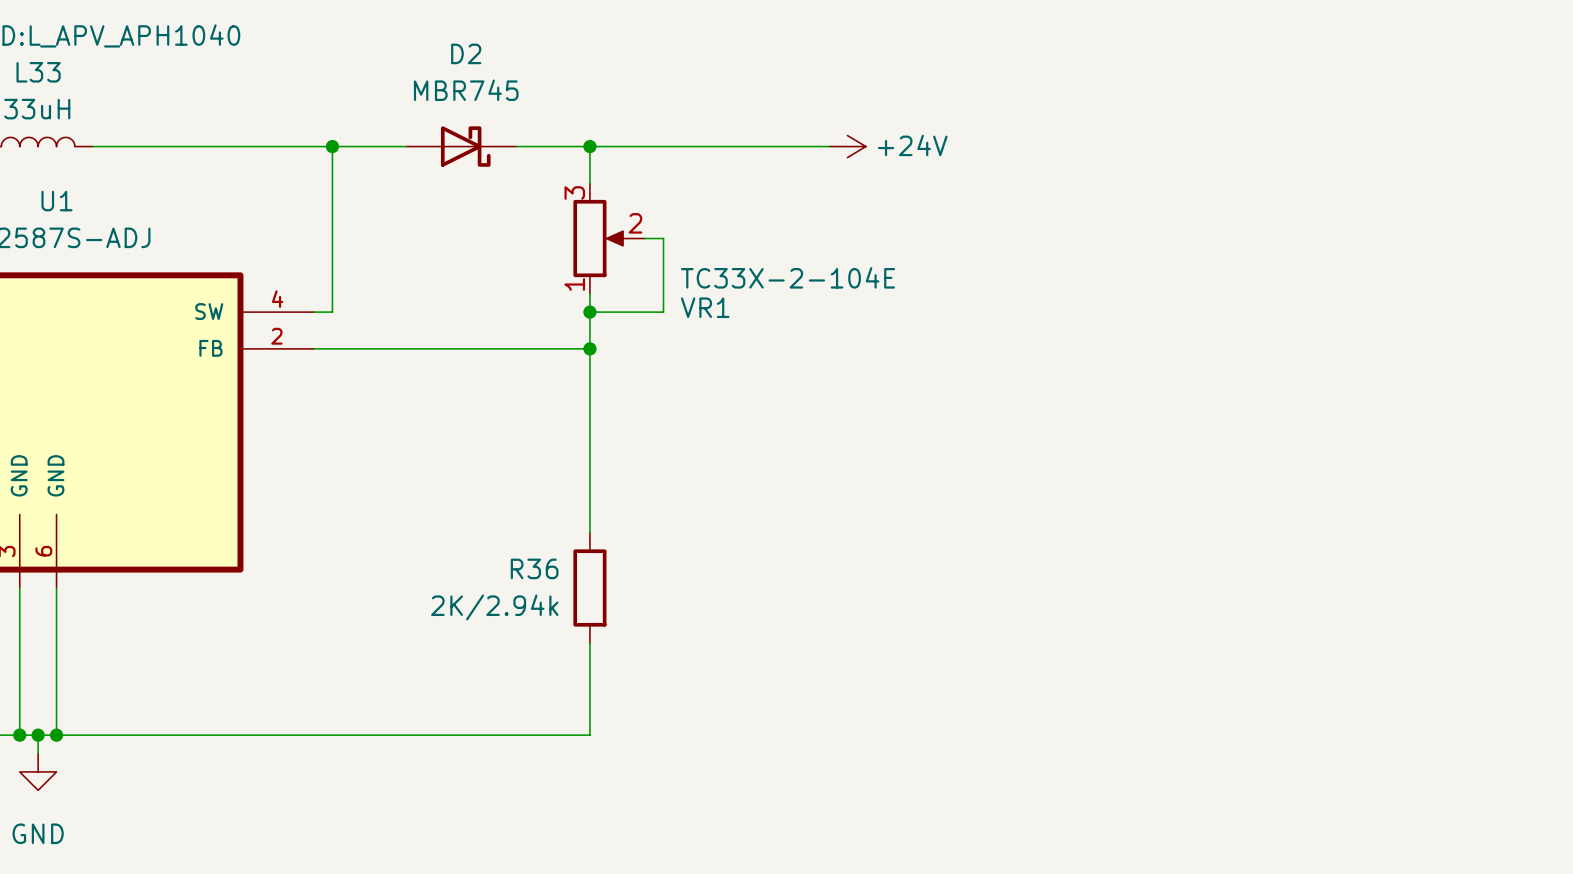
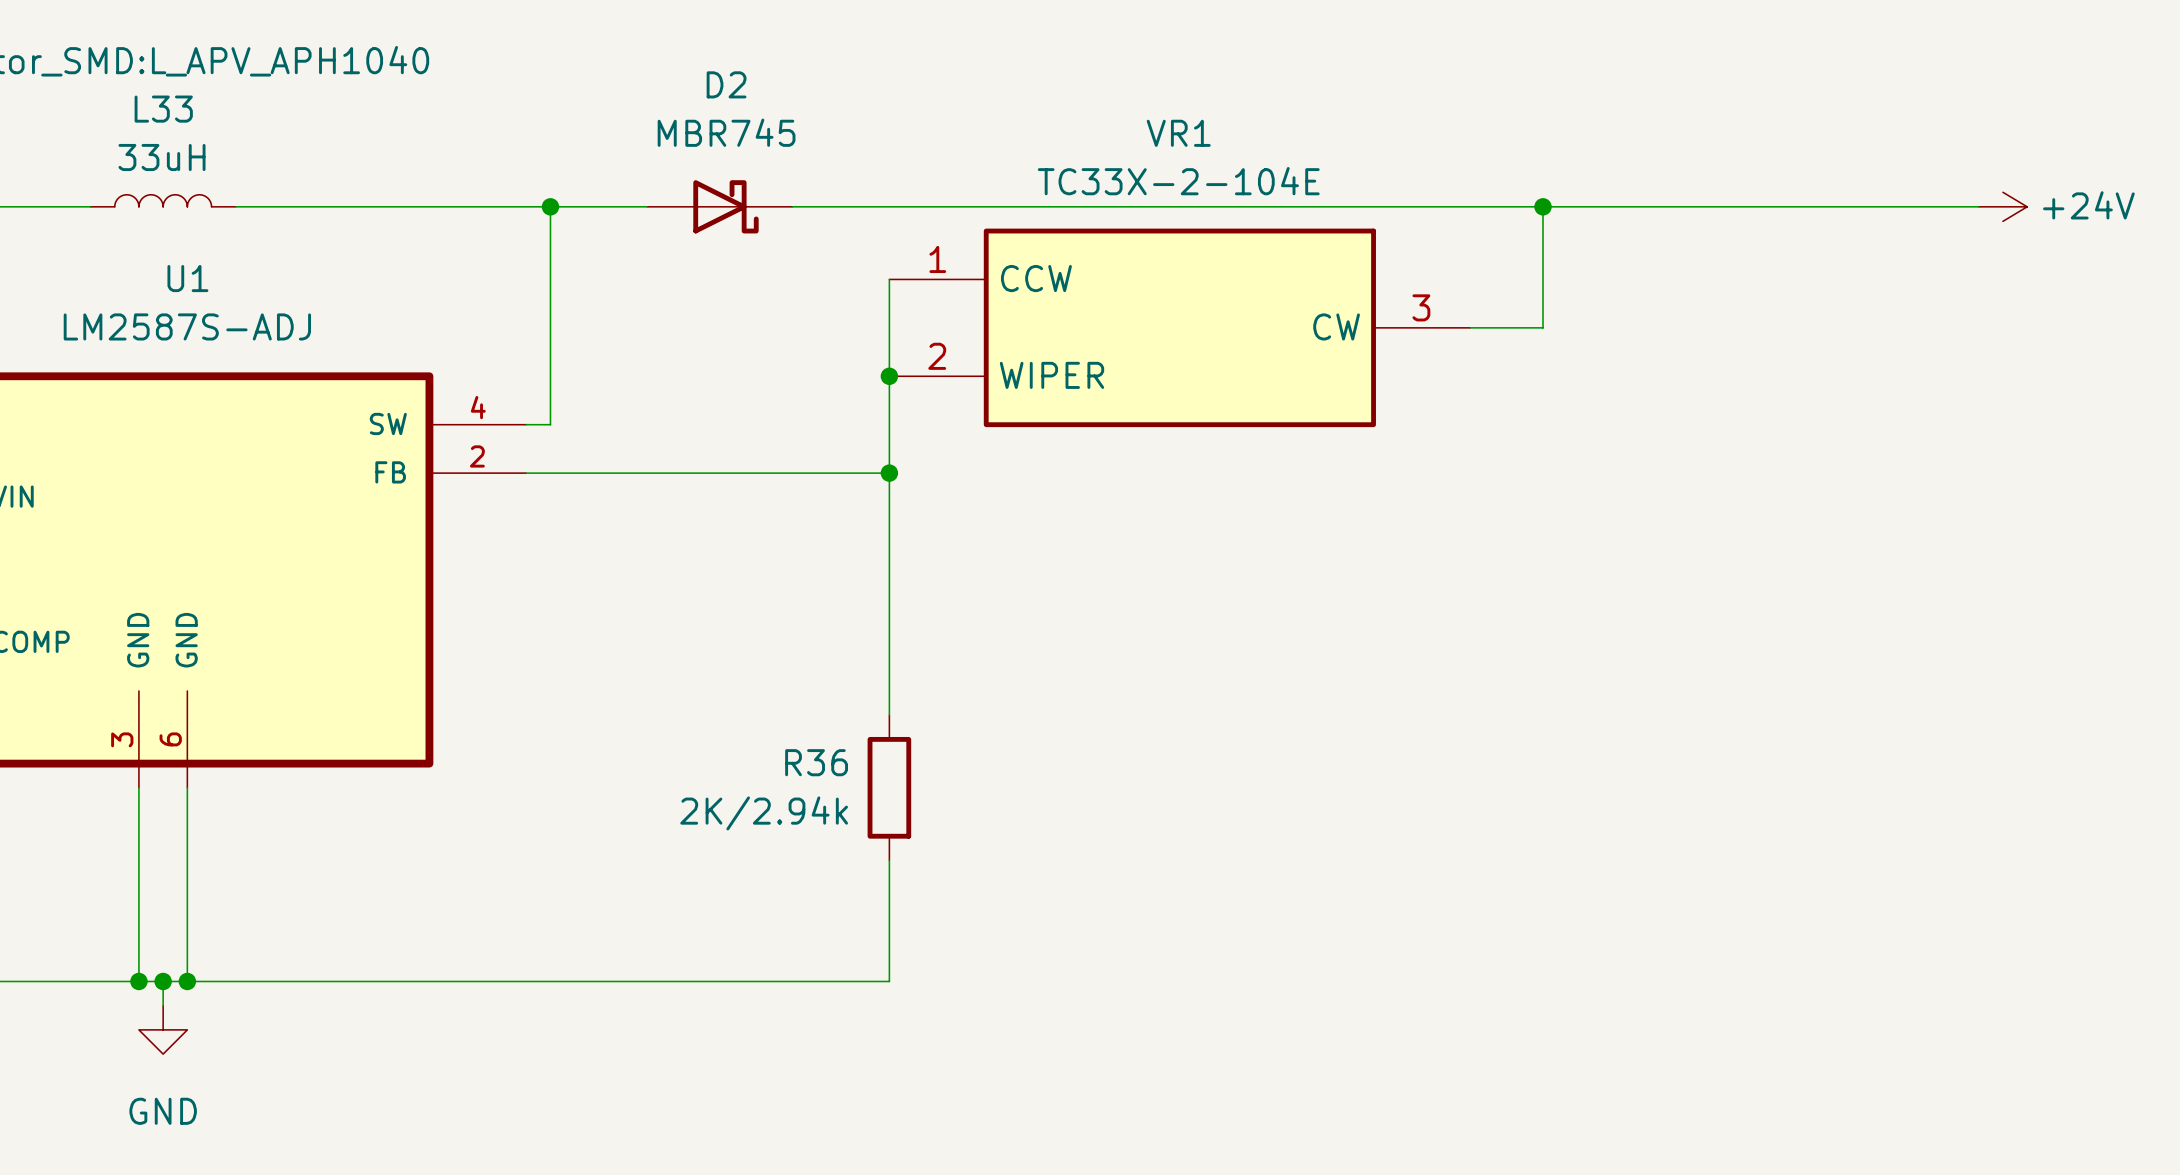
wire: (589, 146) (589, 183) -> none
junction: (589, 146) -> none
wire: none -> (1204, 206) (1978, 206)
power symbol: +24V (847, 146) -> none
wire: none -> (1543, 206) (1543, 327) (1470, 327)
junction: none -> (1543, 206)
power symbol: none -> +24V (2002, 206)
VR1 symbol: [573, 183, 646, 294] -> [889, 228, 1471, 428]
wire: none -> (889, 279) (889, 400)
wire: (645, 238) (663, 238) (663, 312) (589, 312) -> none
VR1 value position: TC33X-2-104E (788, 277) -> TC33X-2-104E (1178, 181)
VR1 name position: VR1 (705, 307) -> VR1 (1178, 133)
junction position: (589, 312) -> (889, 376)

